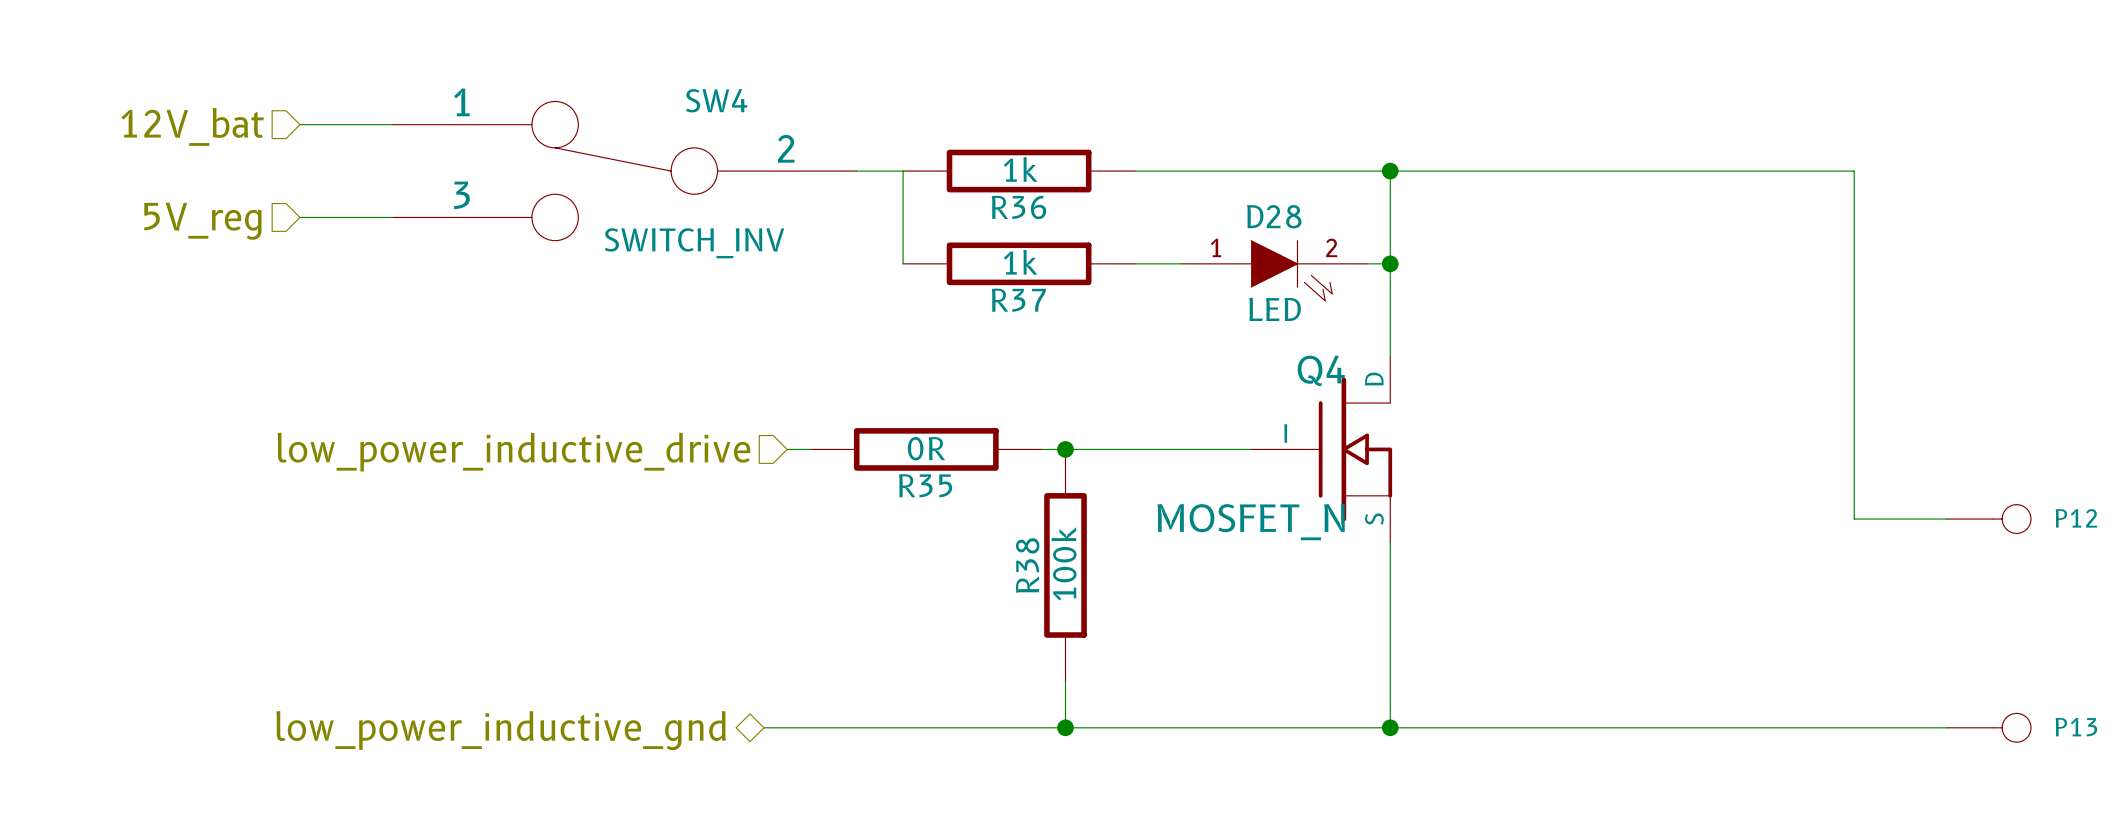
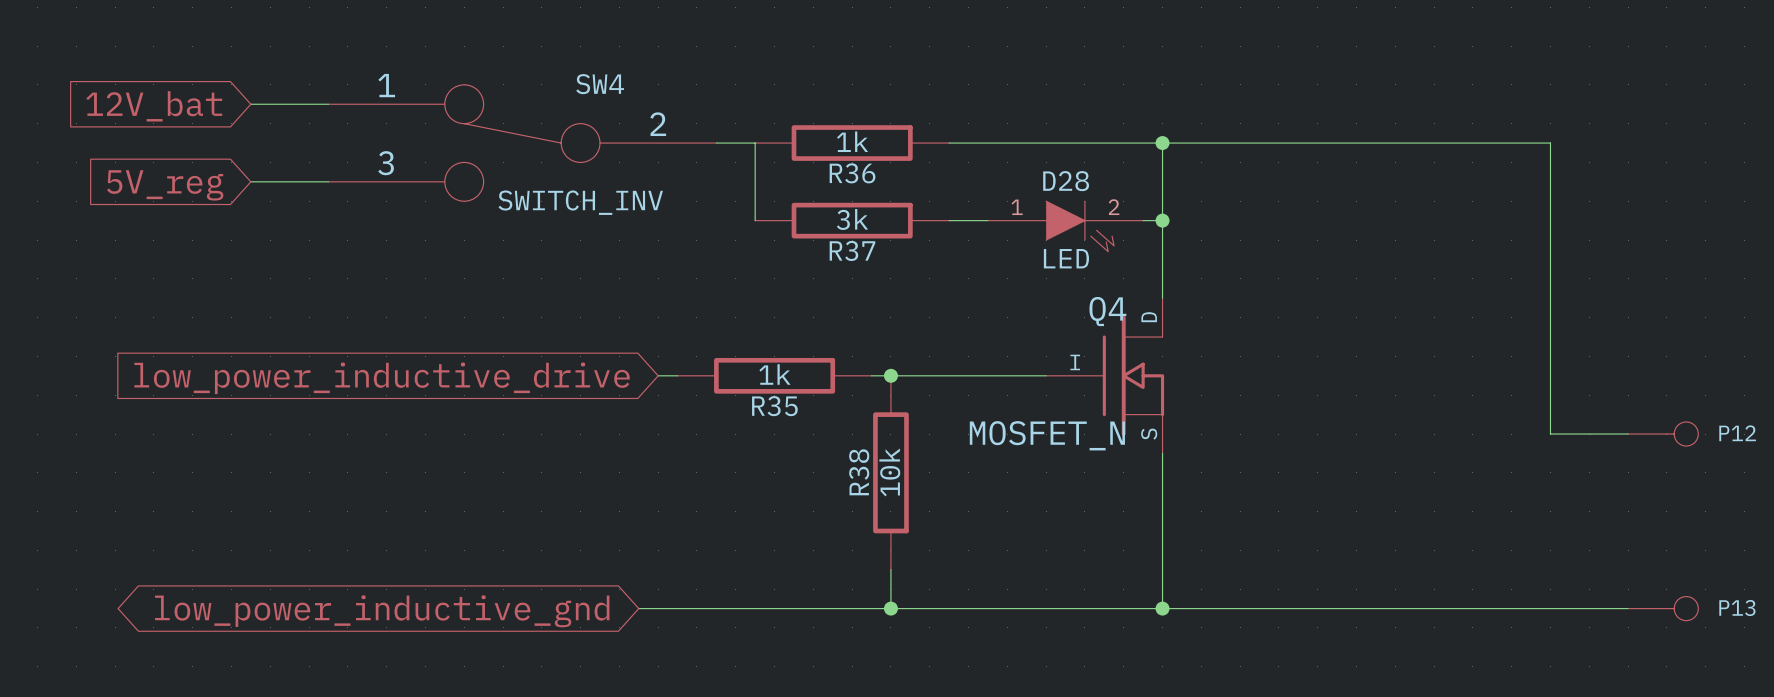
hierarchical label: 12V_bat (192, 126) -> none
global label: none -> 12V_bat (154, 106)
hierarchical label: 5V_reg (202, 221) -> none
global label: none -> 5V_reg (165, 185)
R37 value: 1k (1020, 262) -> 3k (852, 219)
R35 value: 0R (926, 448) -> 1k (774, 374)
hierarchical label: low_power_inductive_drive (513, 452) -> none
global label: none -> low_power_inductive_drive (382, 378)
R38 value: 100k (1063, 563) -> 10k (889, 472)
hierarchical label: low_power_inductive_gnd (501, 730) -> none
global label: none -> low_power_inductive_gnd (382, 611)

